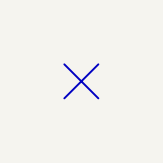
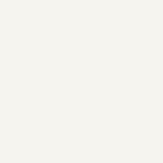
no-connect mark: (81, 81) -> none

